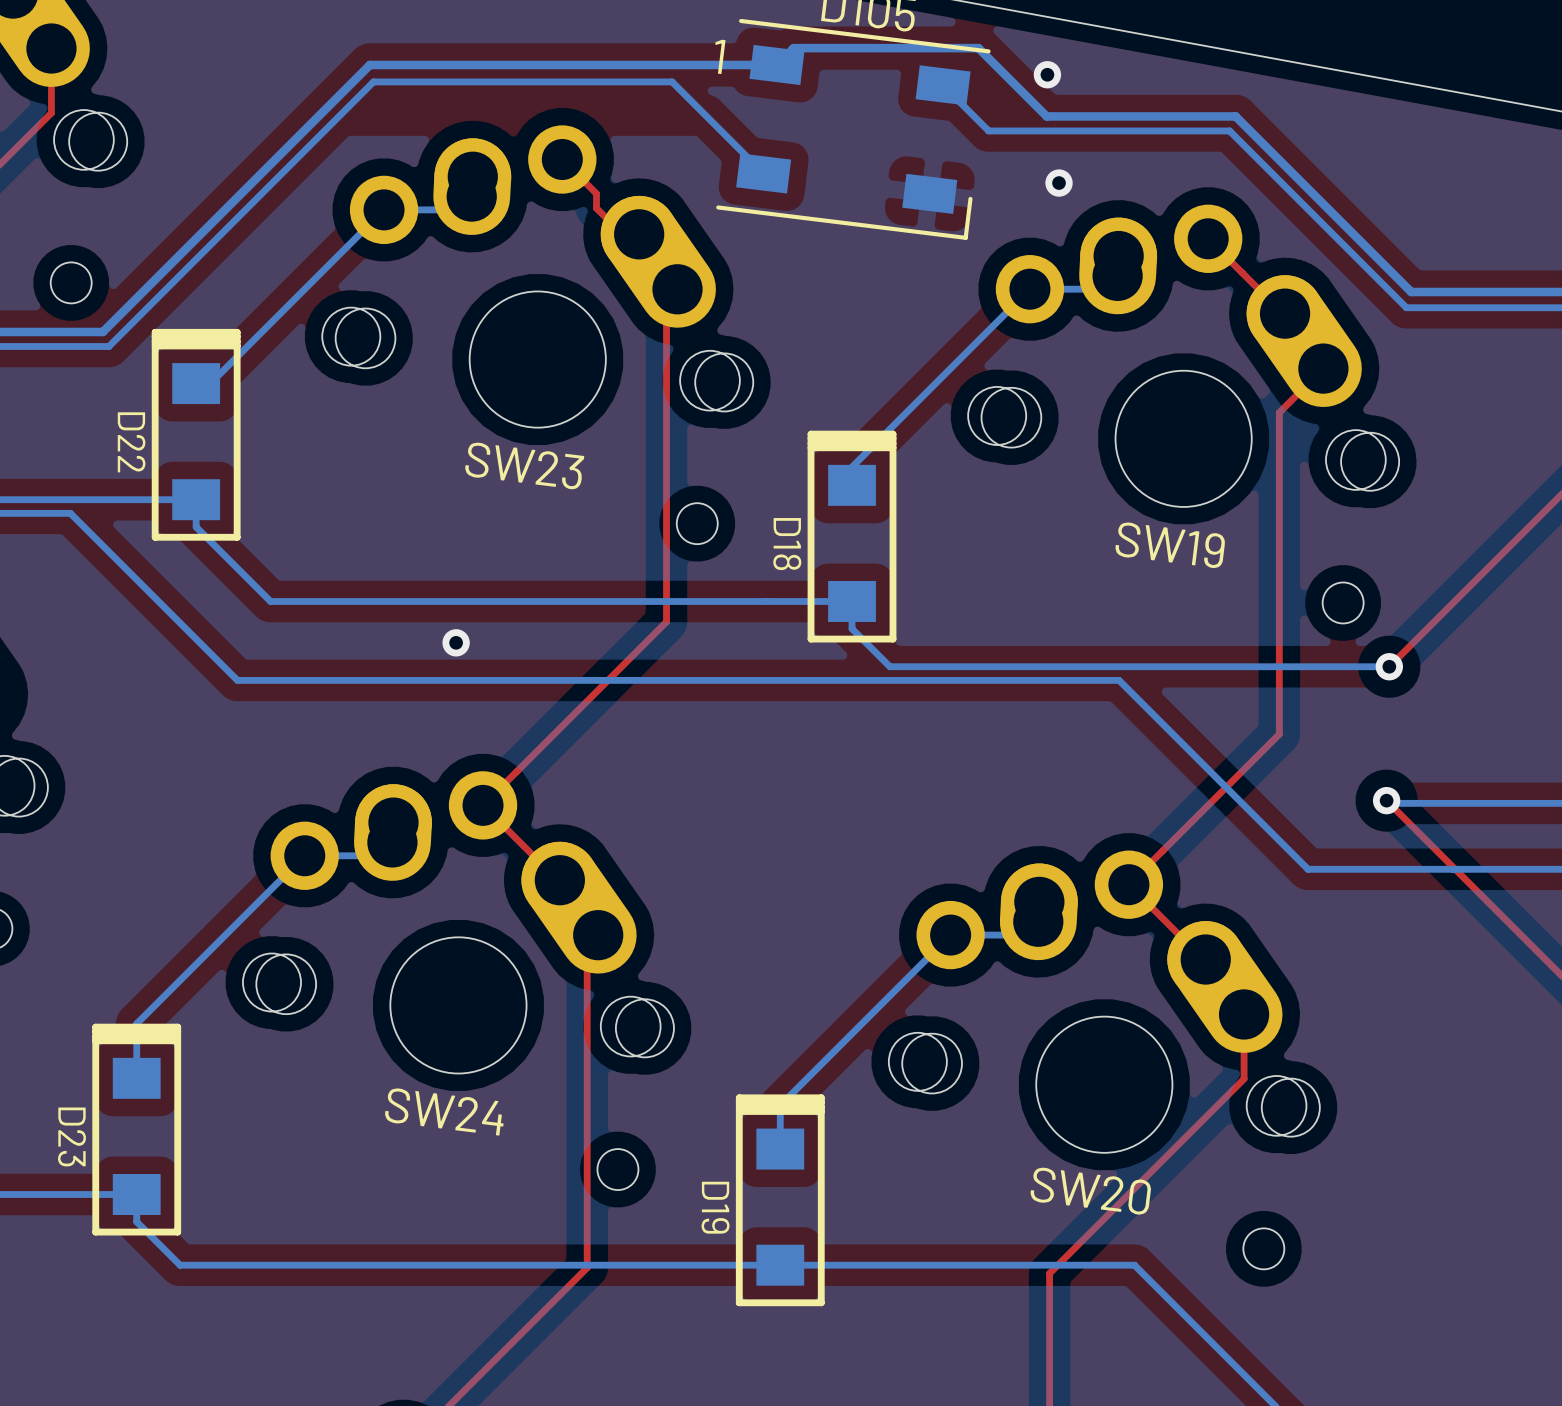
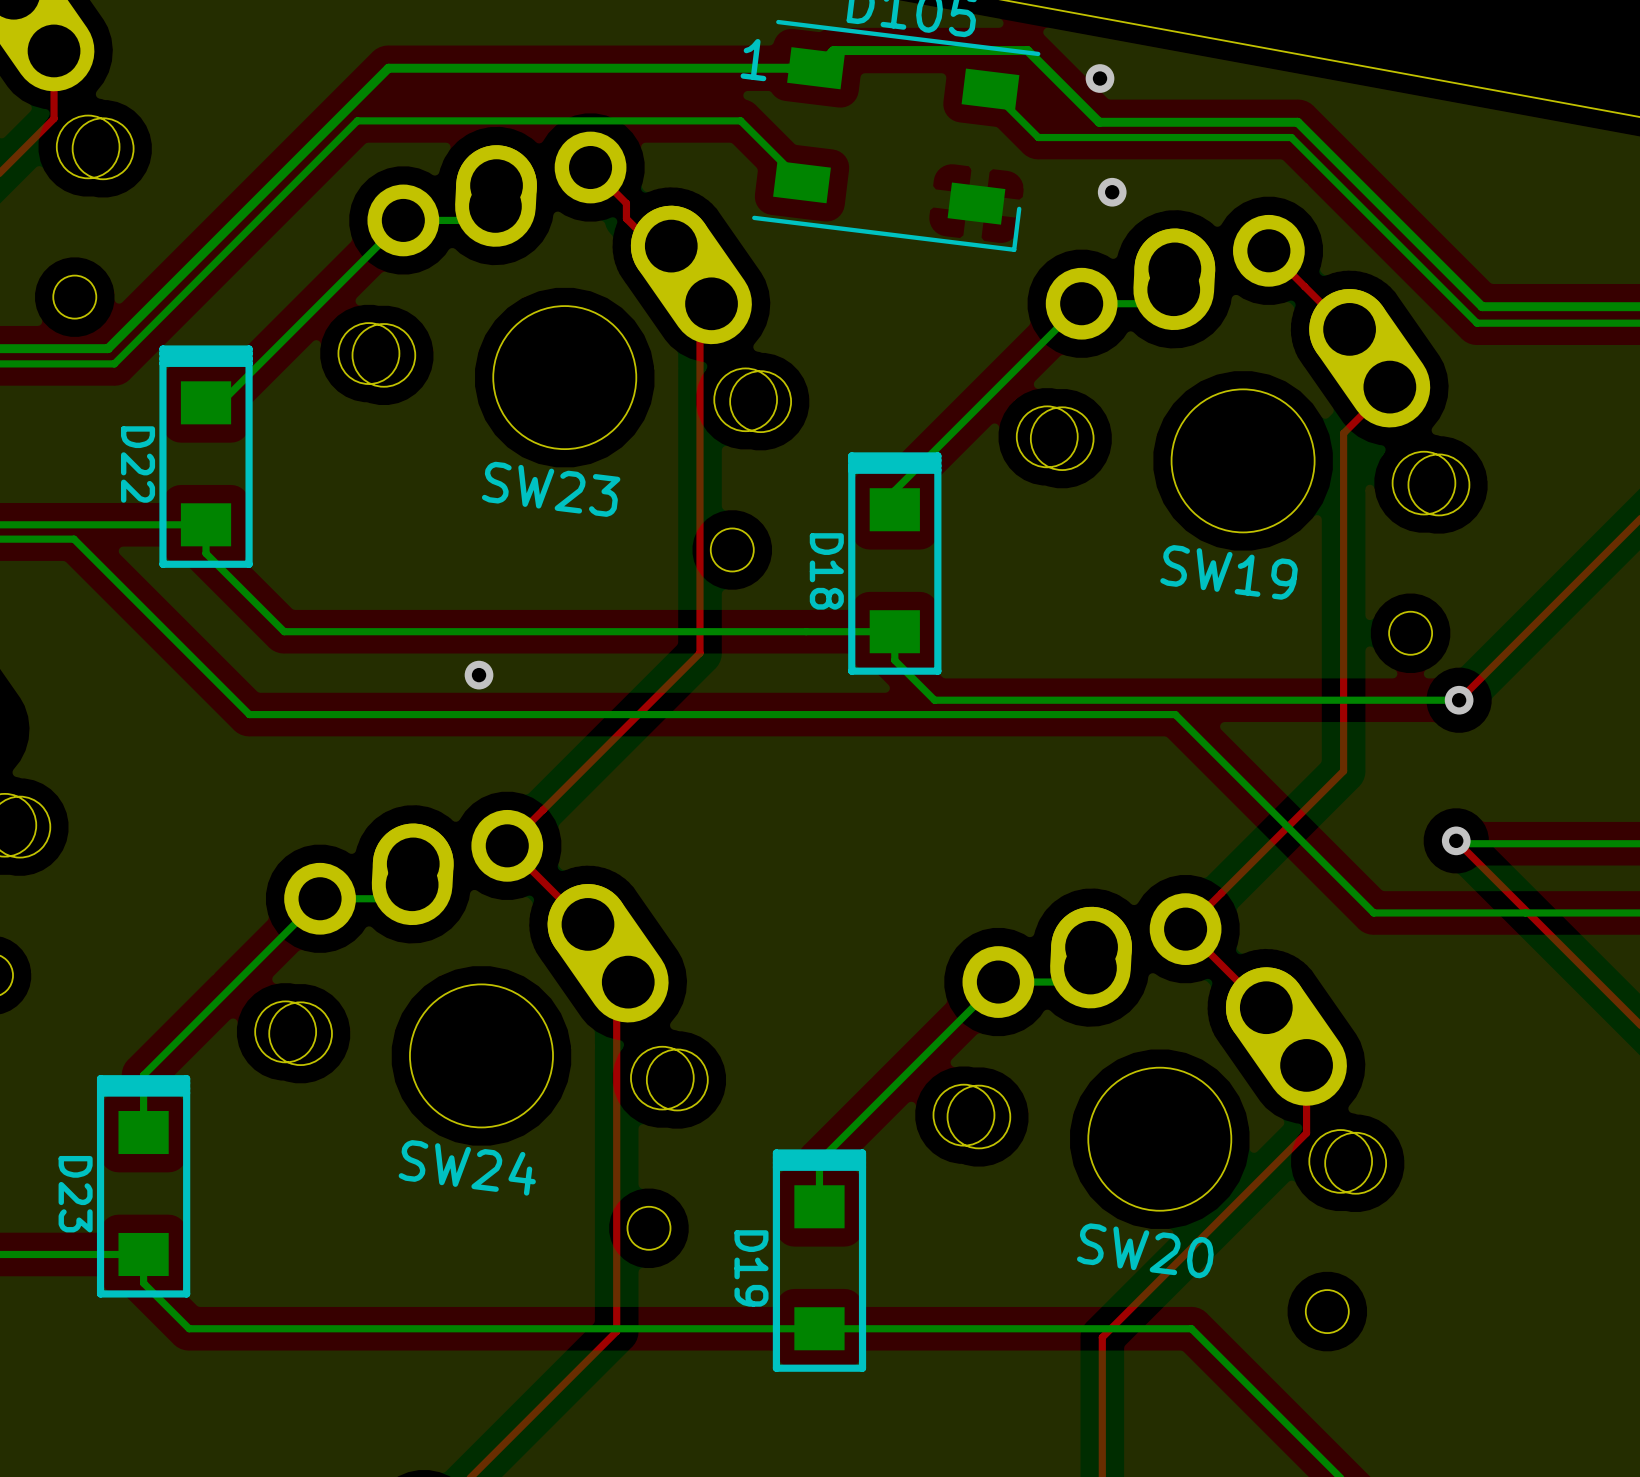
bottom track: (705, 115) (672, 81) (373, 81) (340, 115) -> (740, 120) (357, 120)

